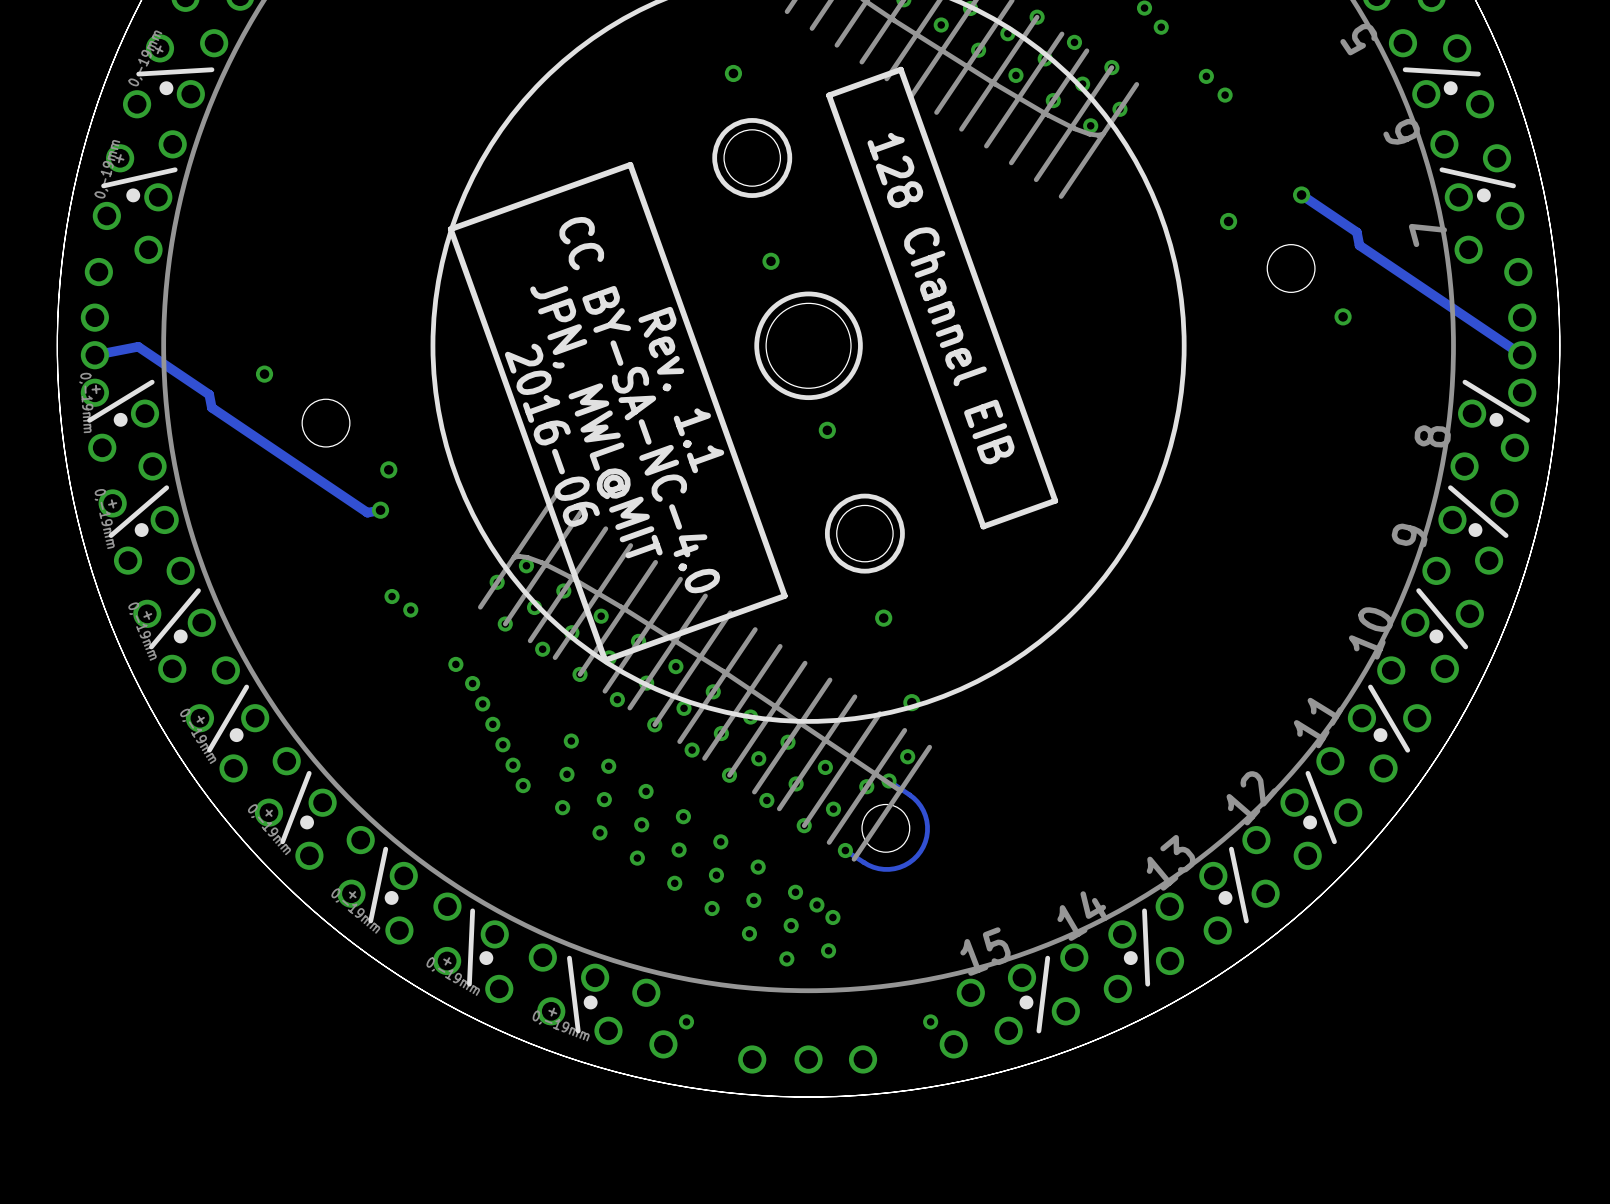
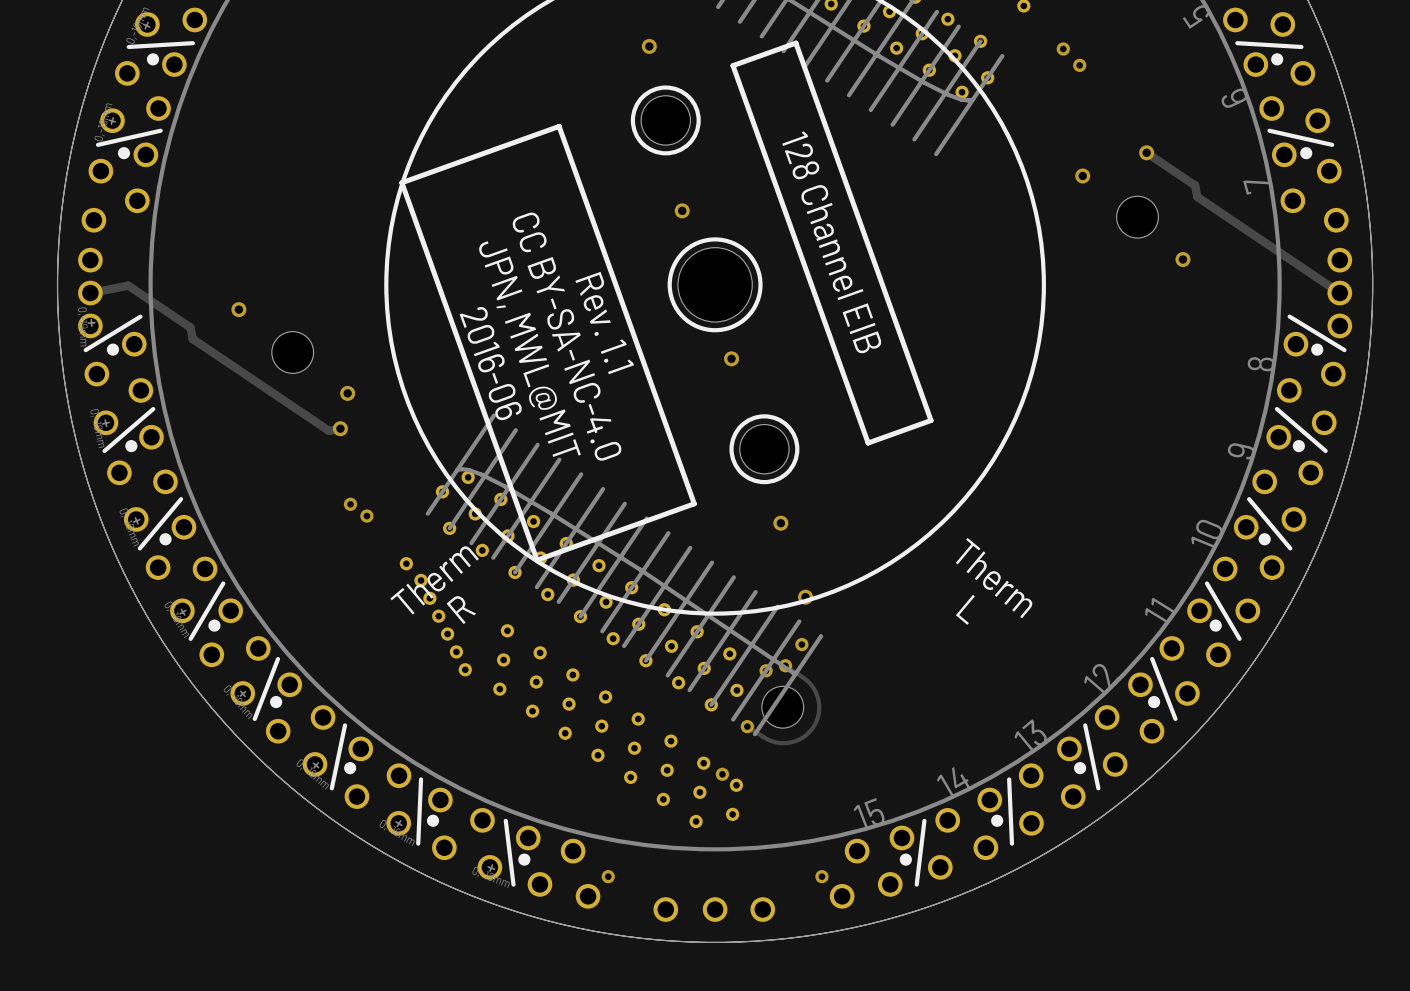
text: none -> Therm (994, 578)
text: none -> Therm (434, 580)
text: none -> R (461, 609)
text: none -> L (965, 609)

